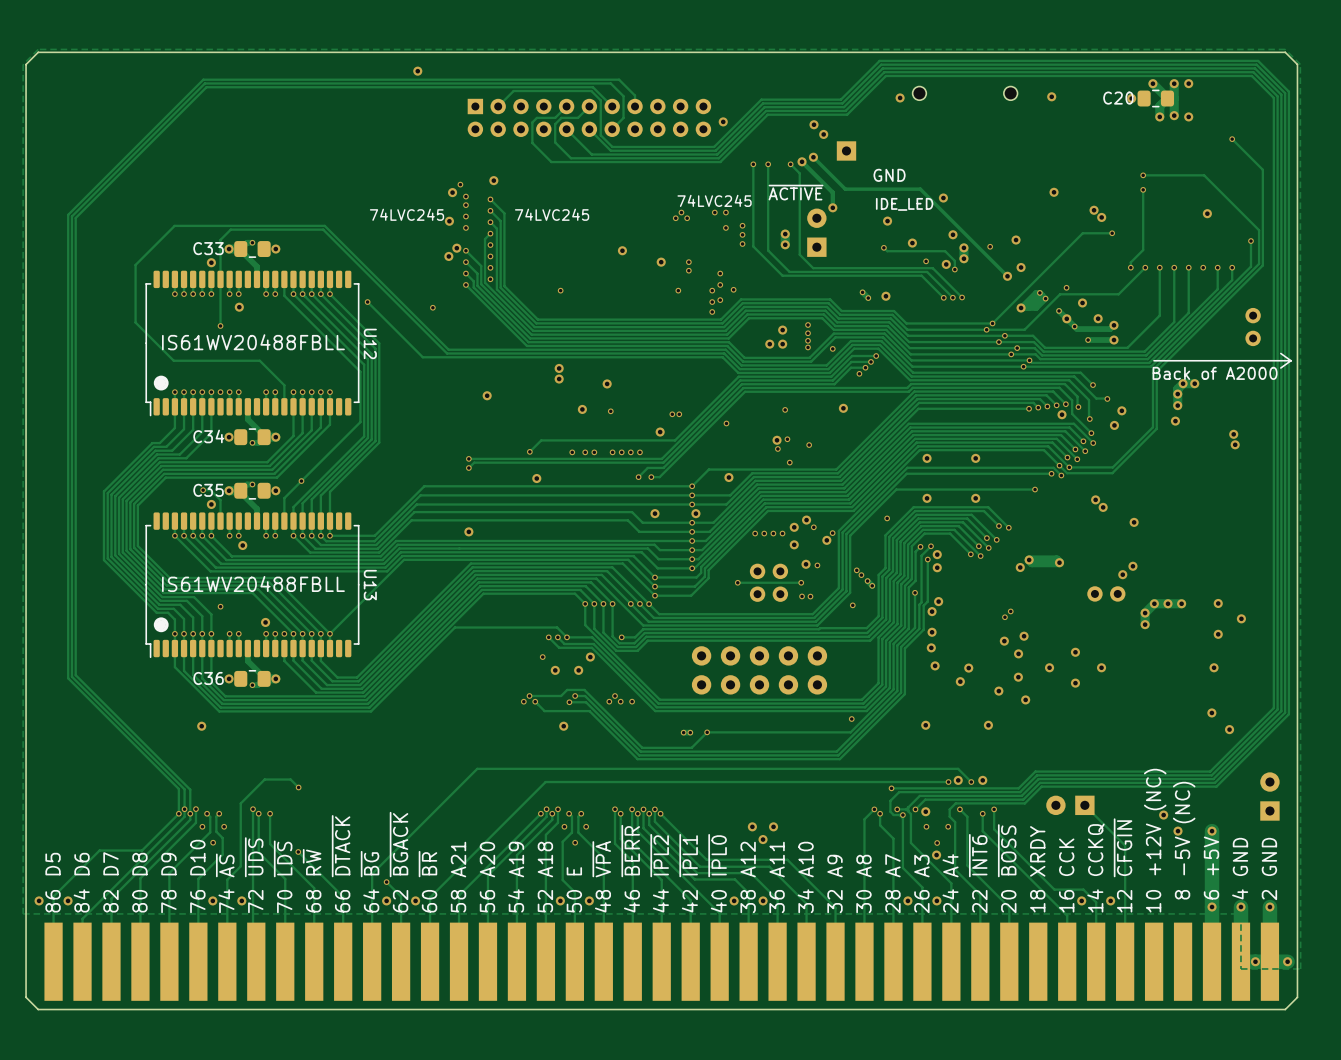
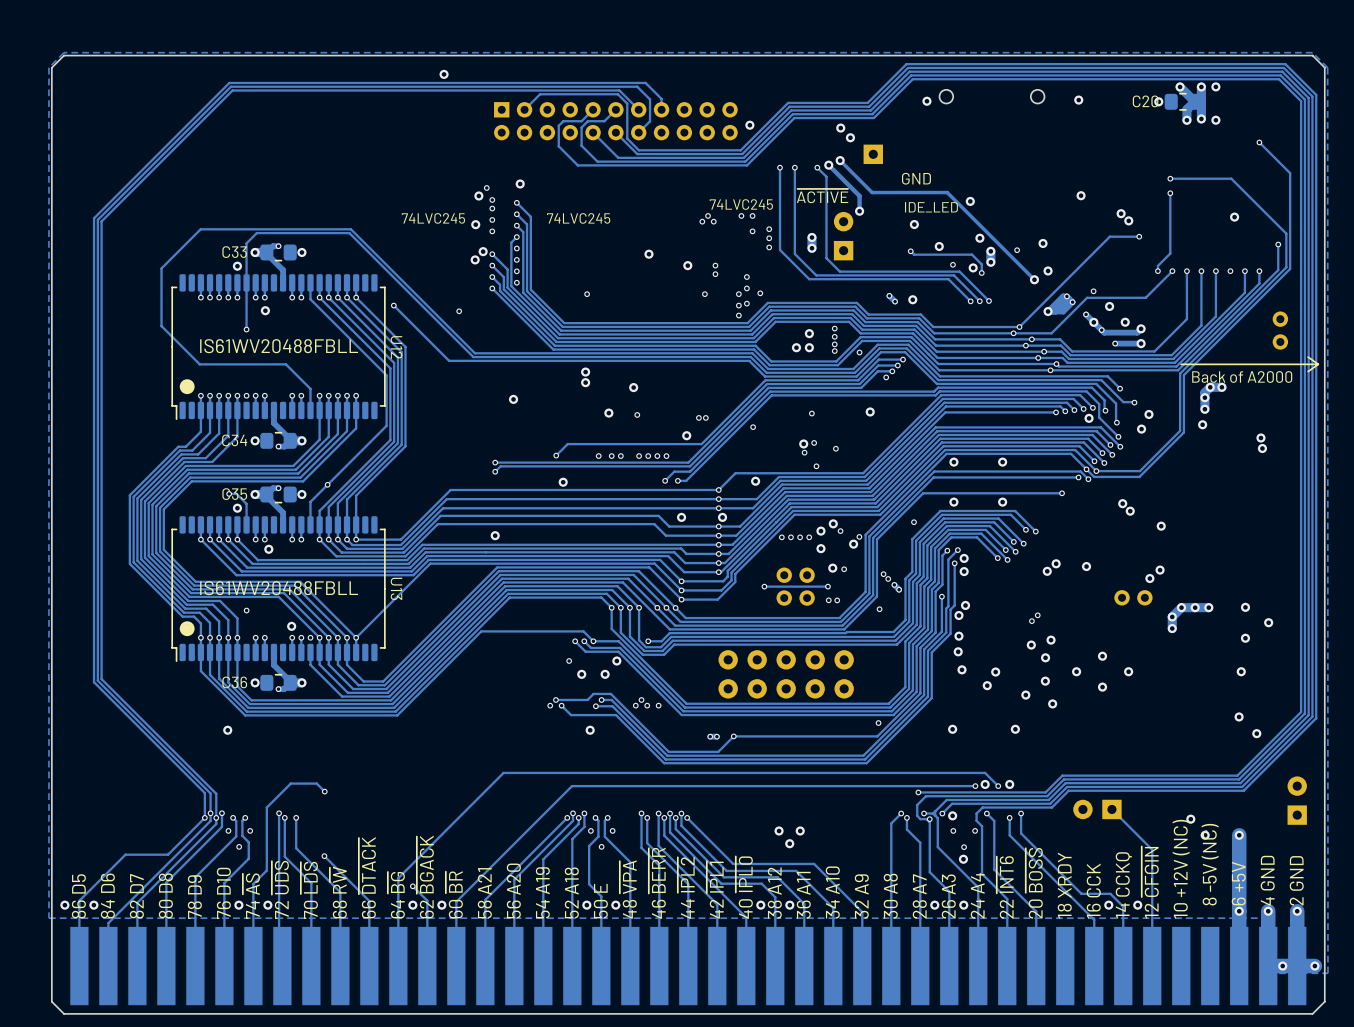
track: (1056, 559) (1059, 562) (1031, 562) (1029, 559) (1056, 559) -> none

